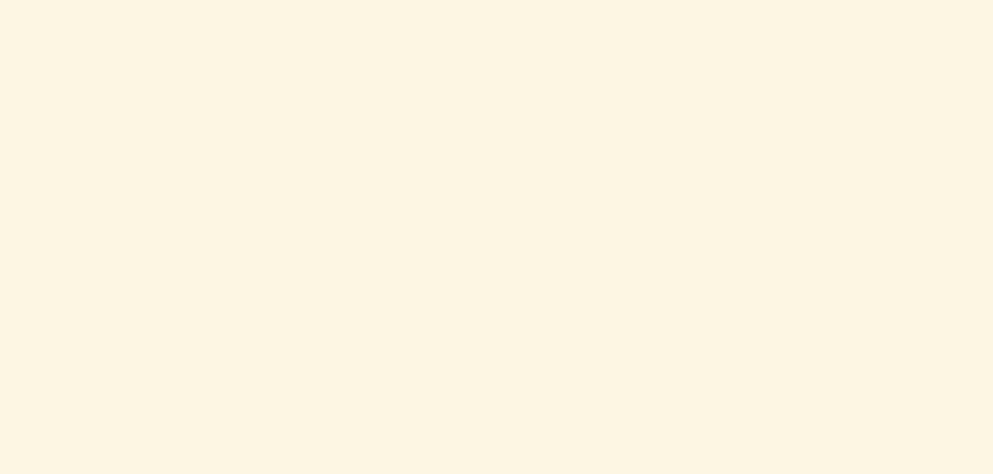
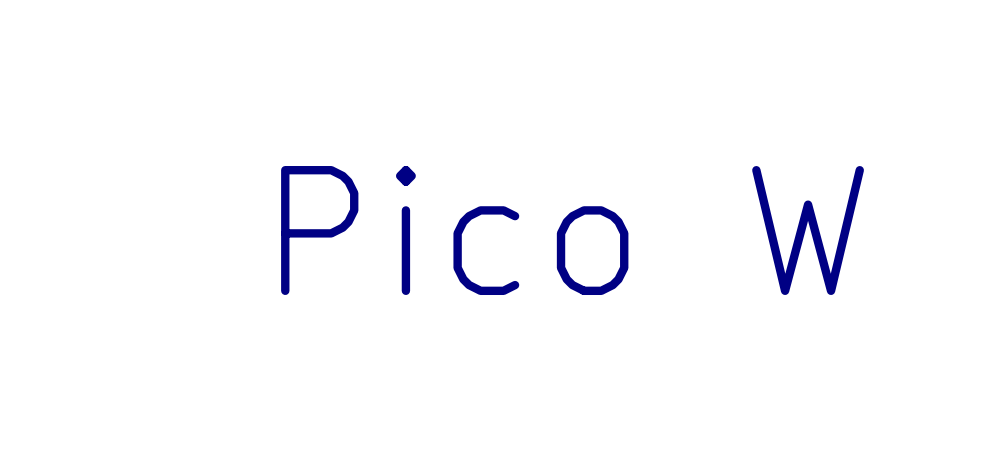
text: none -> Pico W (572, 230)

